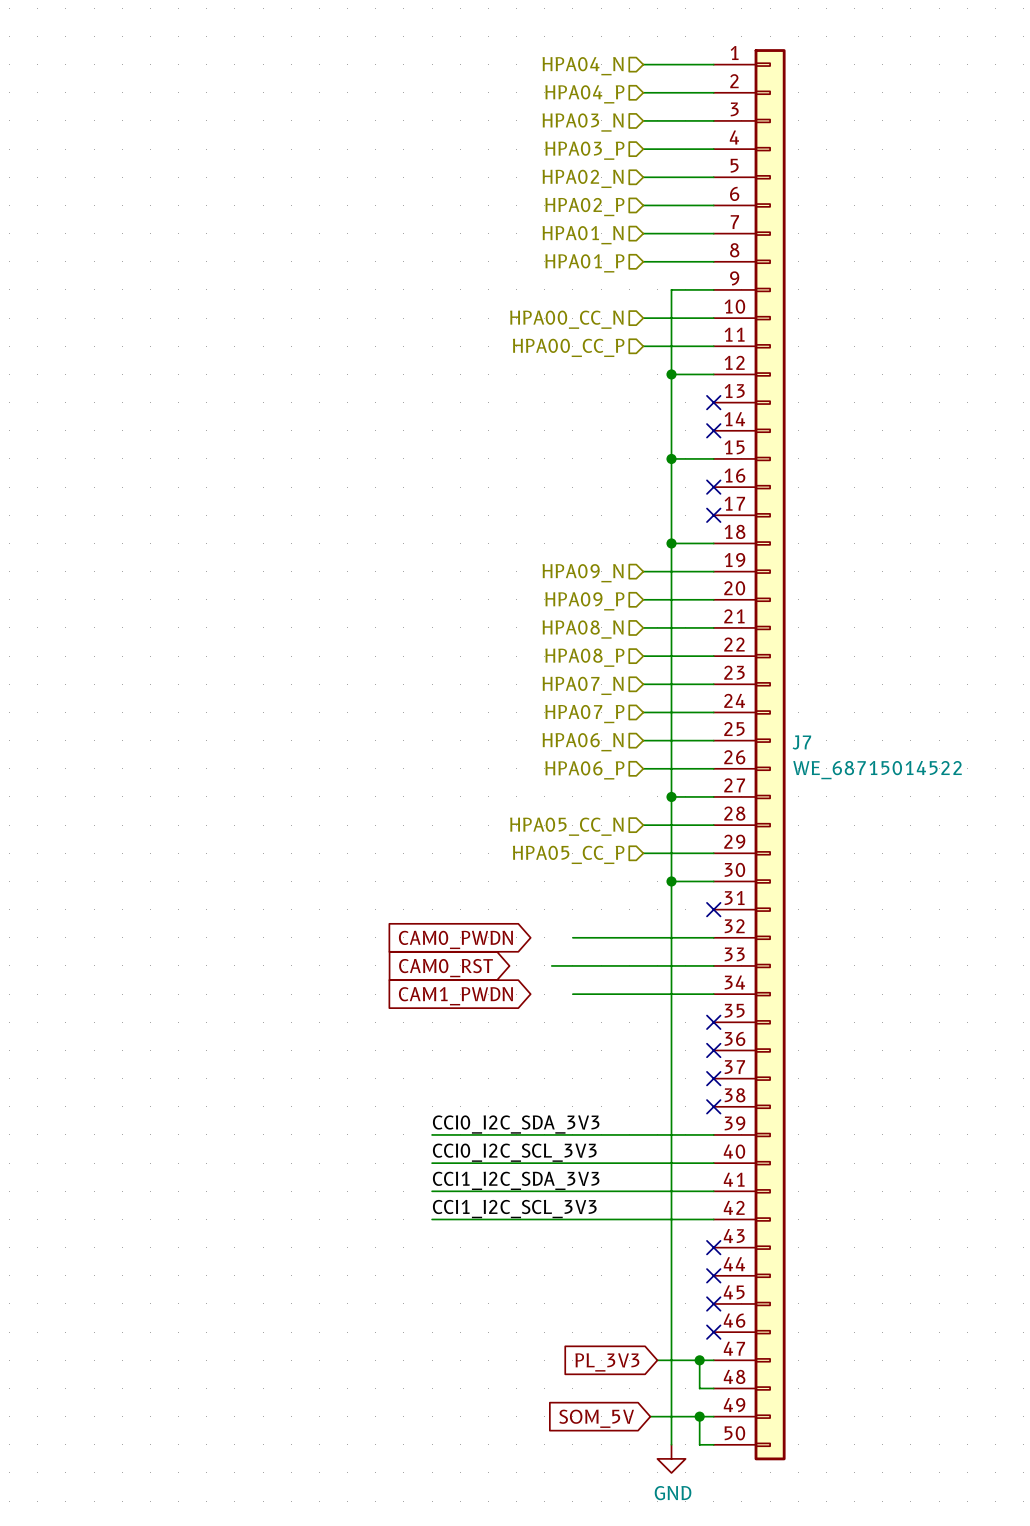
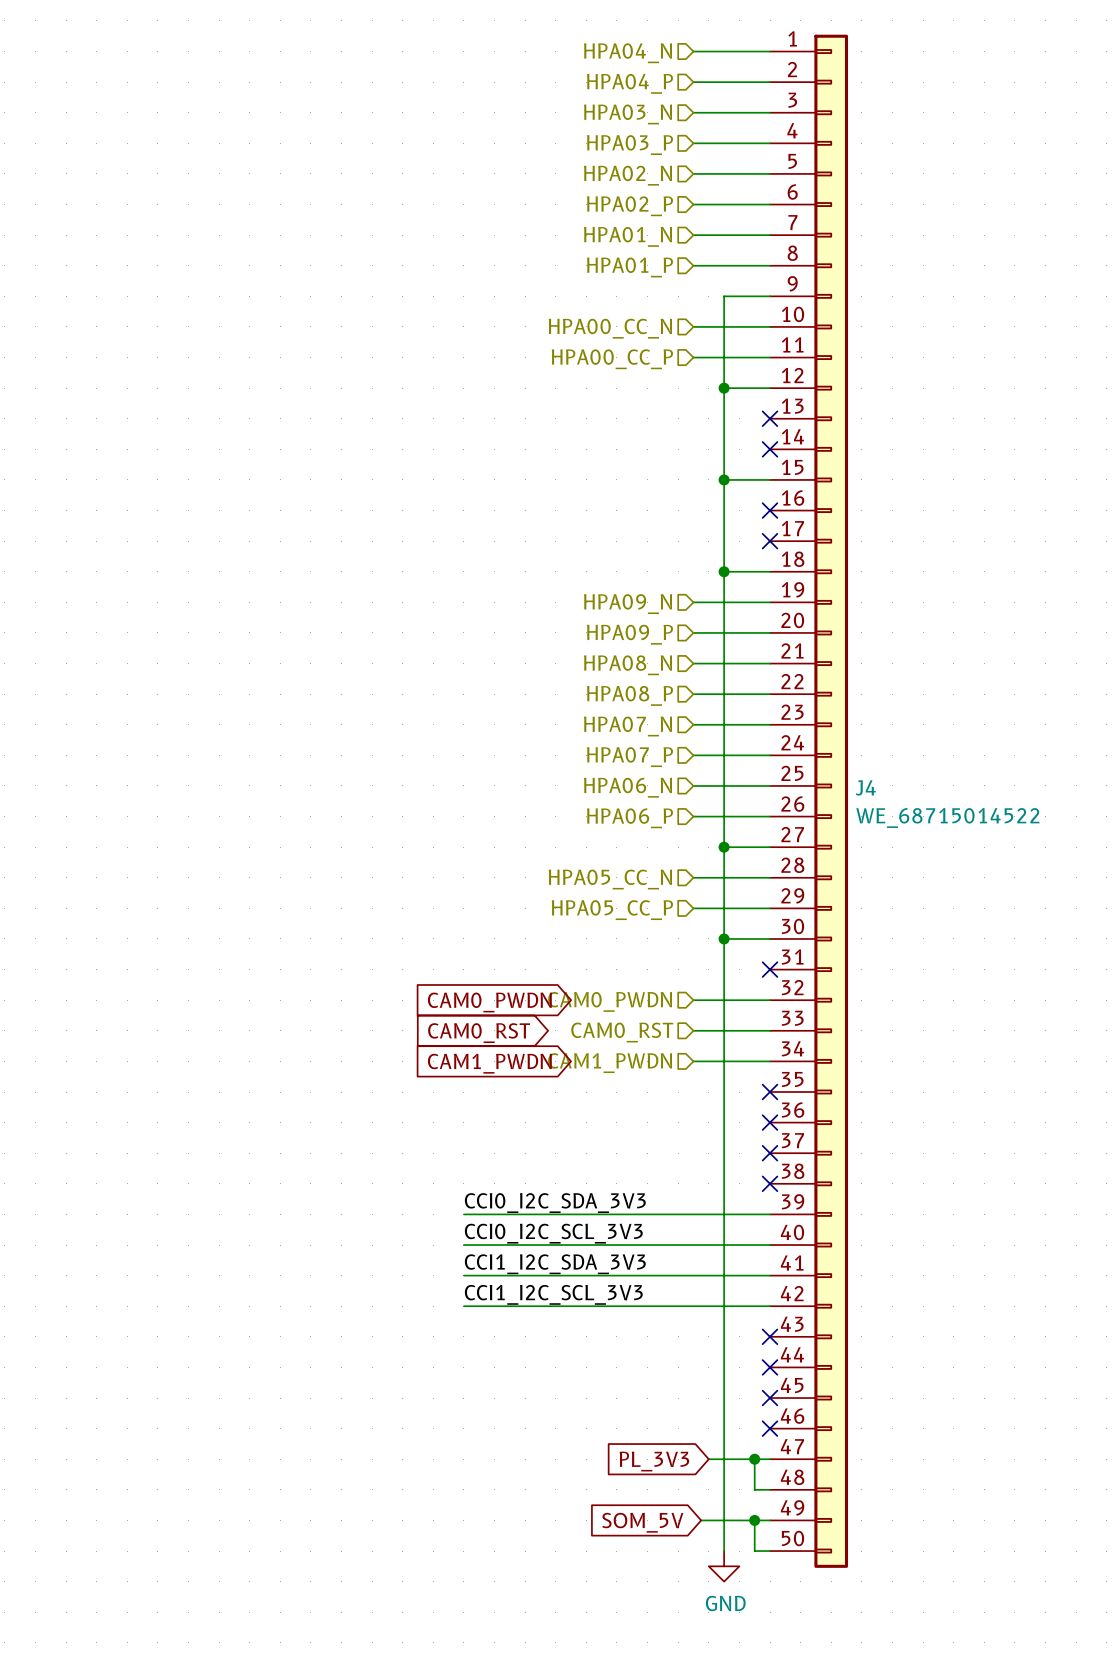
J7 name: J7 (801, 742) -> J4 (865, 787)
wire: (572, 937) (643, 937) -> none
hierarchical label: none -> CAM0_PWDN (610, 1001)
wire: (551, 965) (643, 965) -> none
hierarchical label: none -> CAM0_RST (622, 1032)
wire: (572, 994) (643, 994) -> none
hierarchical label: none -> CAM1_PWDN (610, 1063)

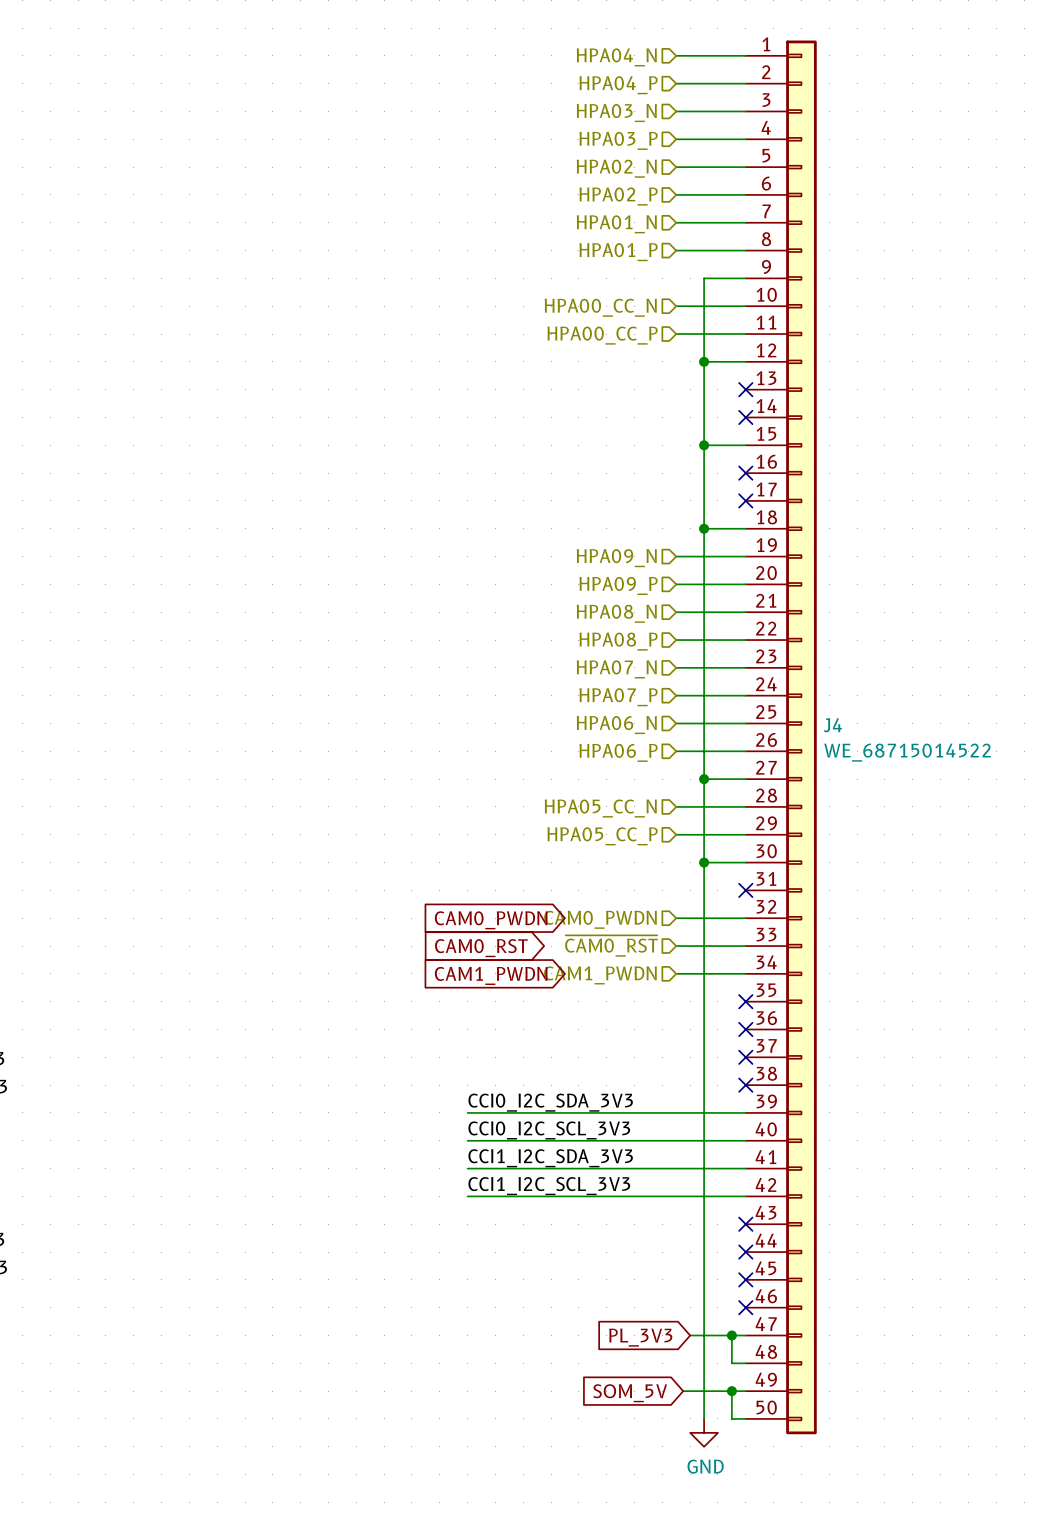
hierarchical label: CAM0_RST (622, 1032) -> ~{CAM0_RST} (611, 946)

